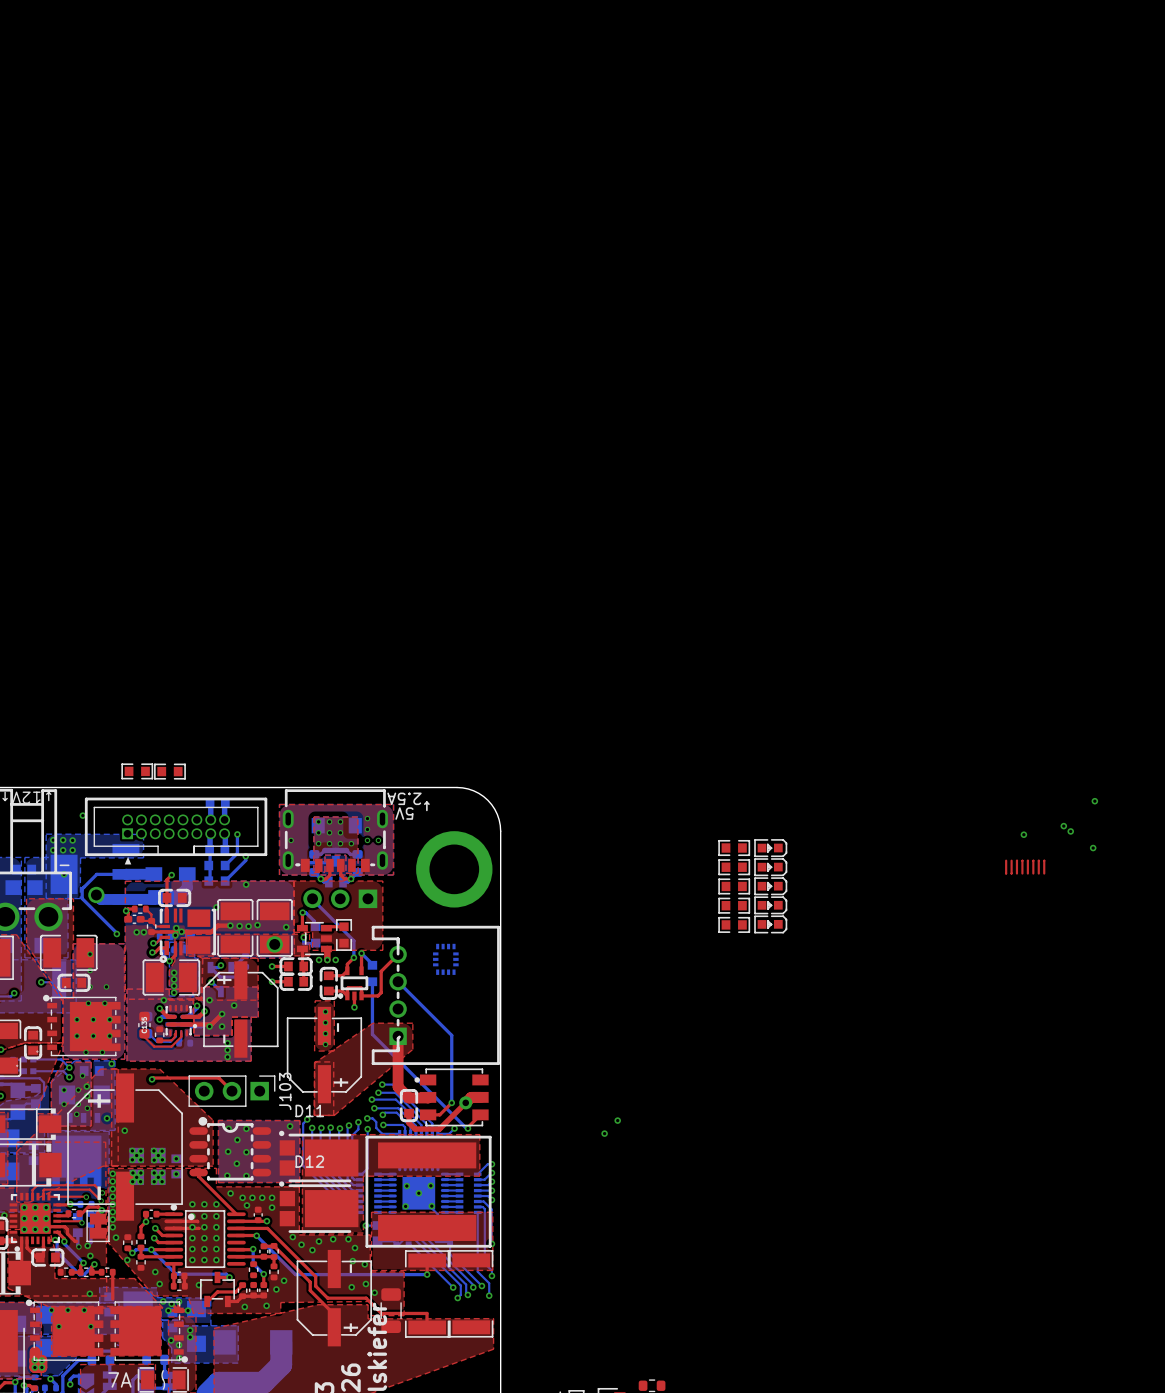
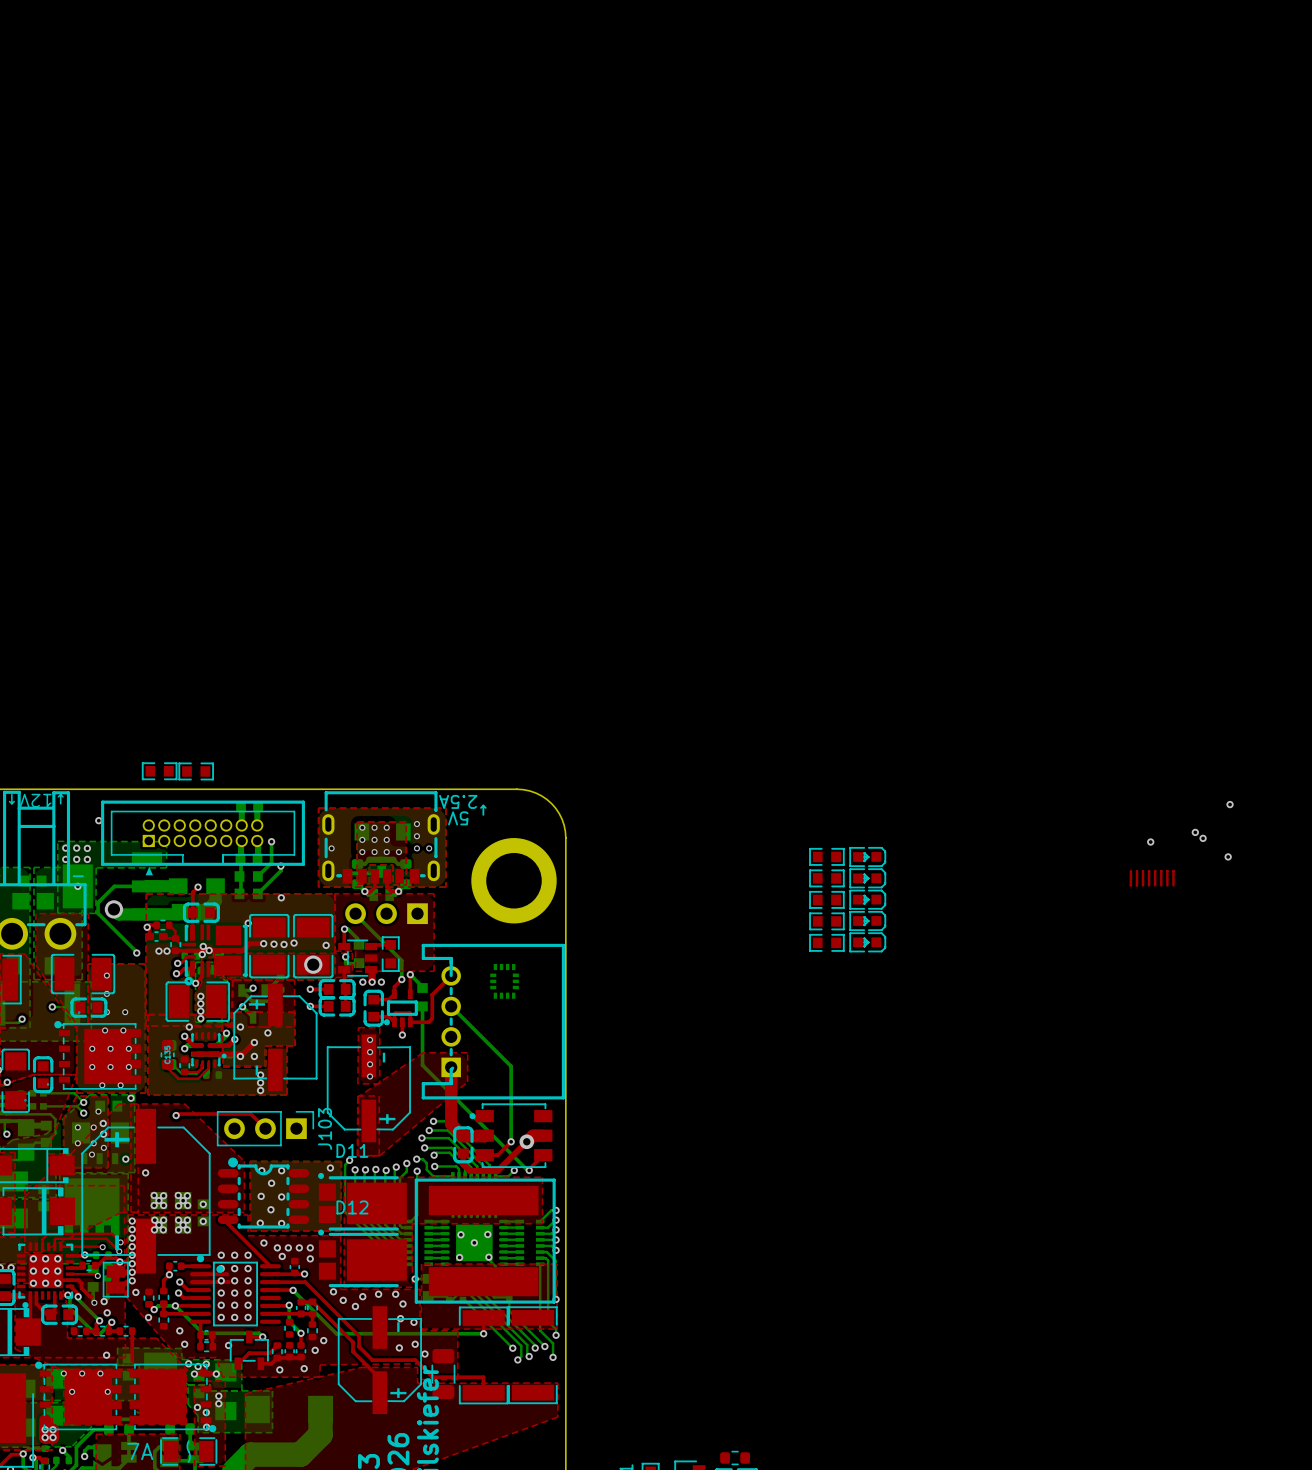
via: (617, 1120) -> none
via: (604, 1133) -> none

